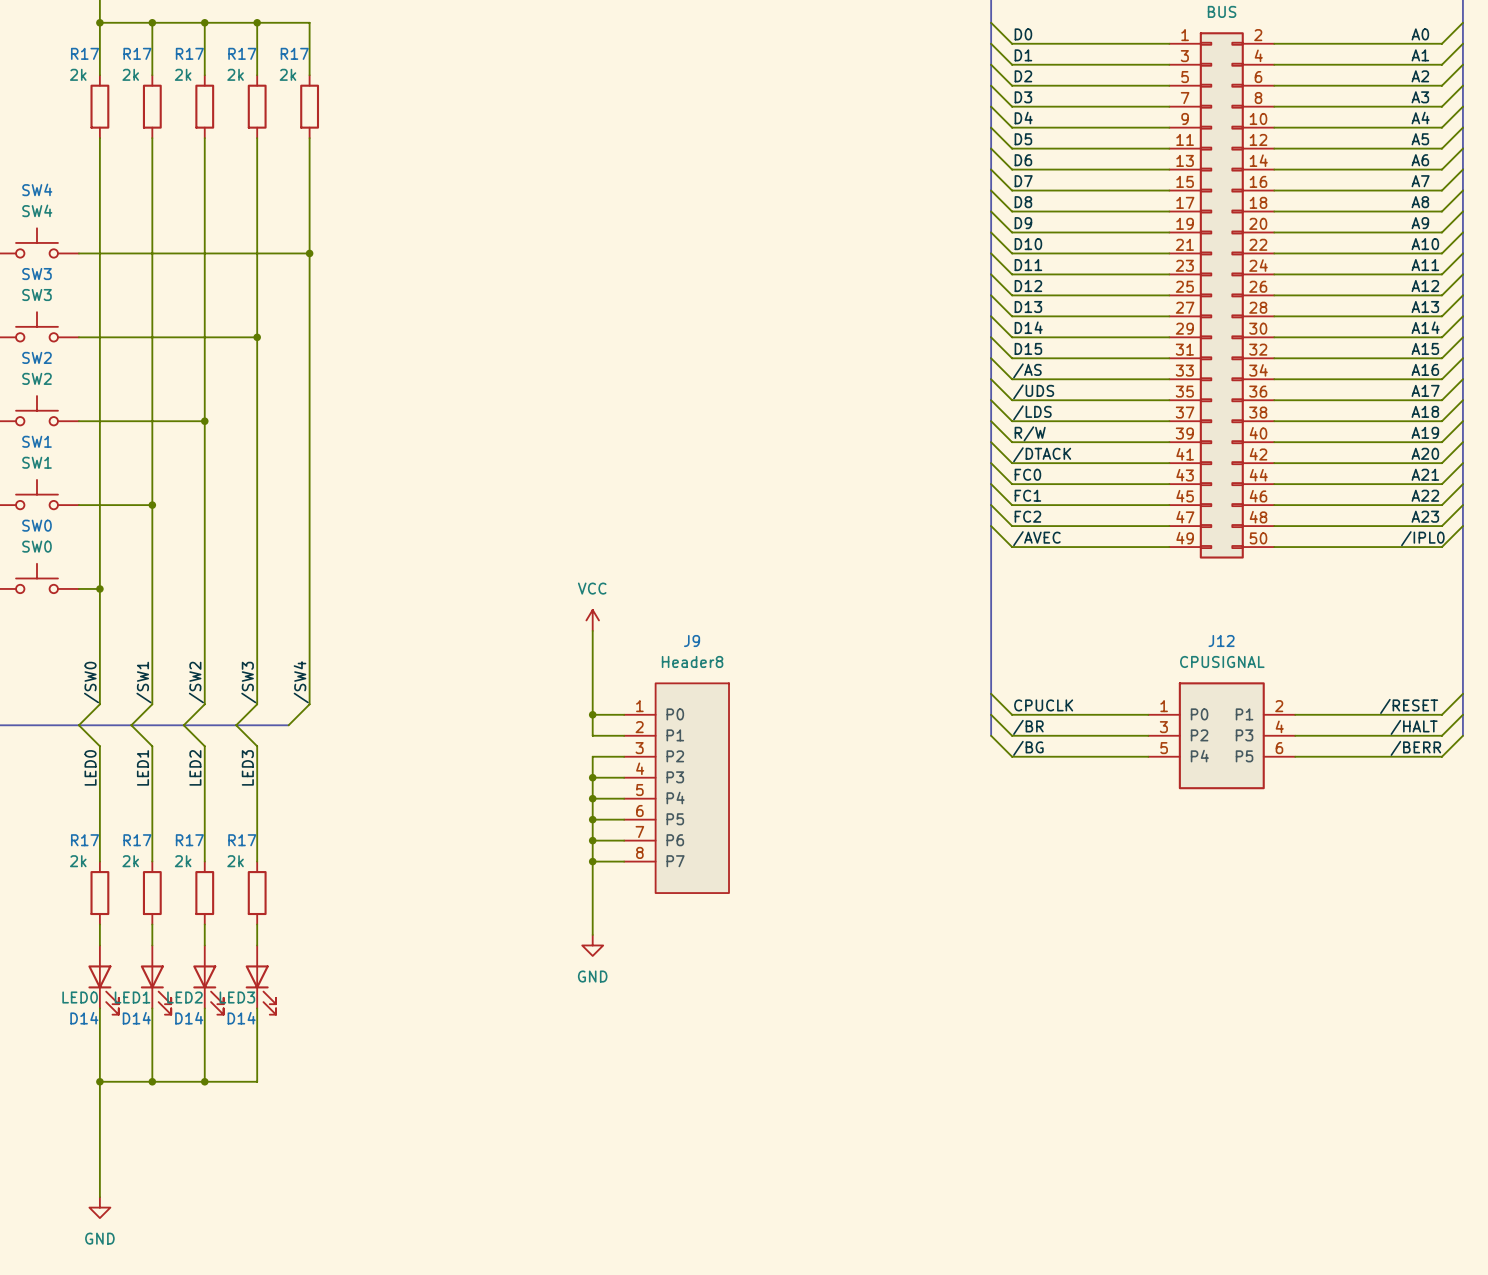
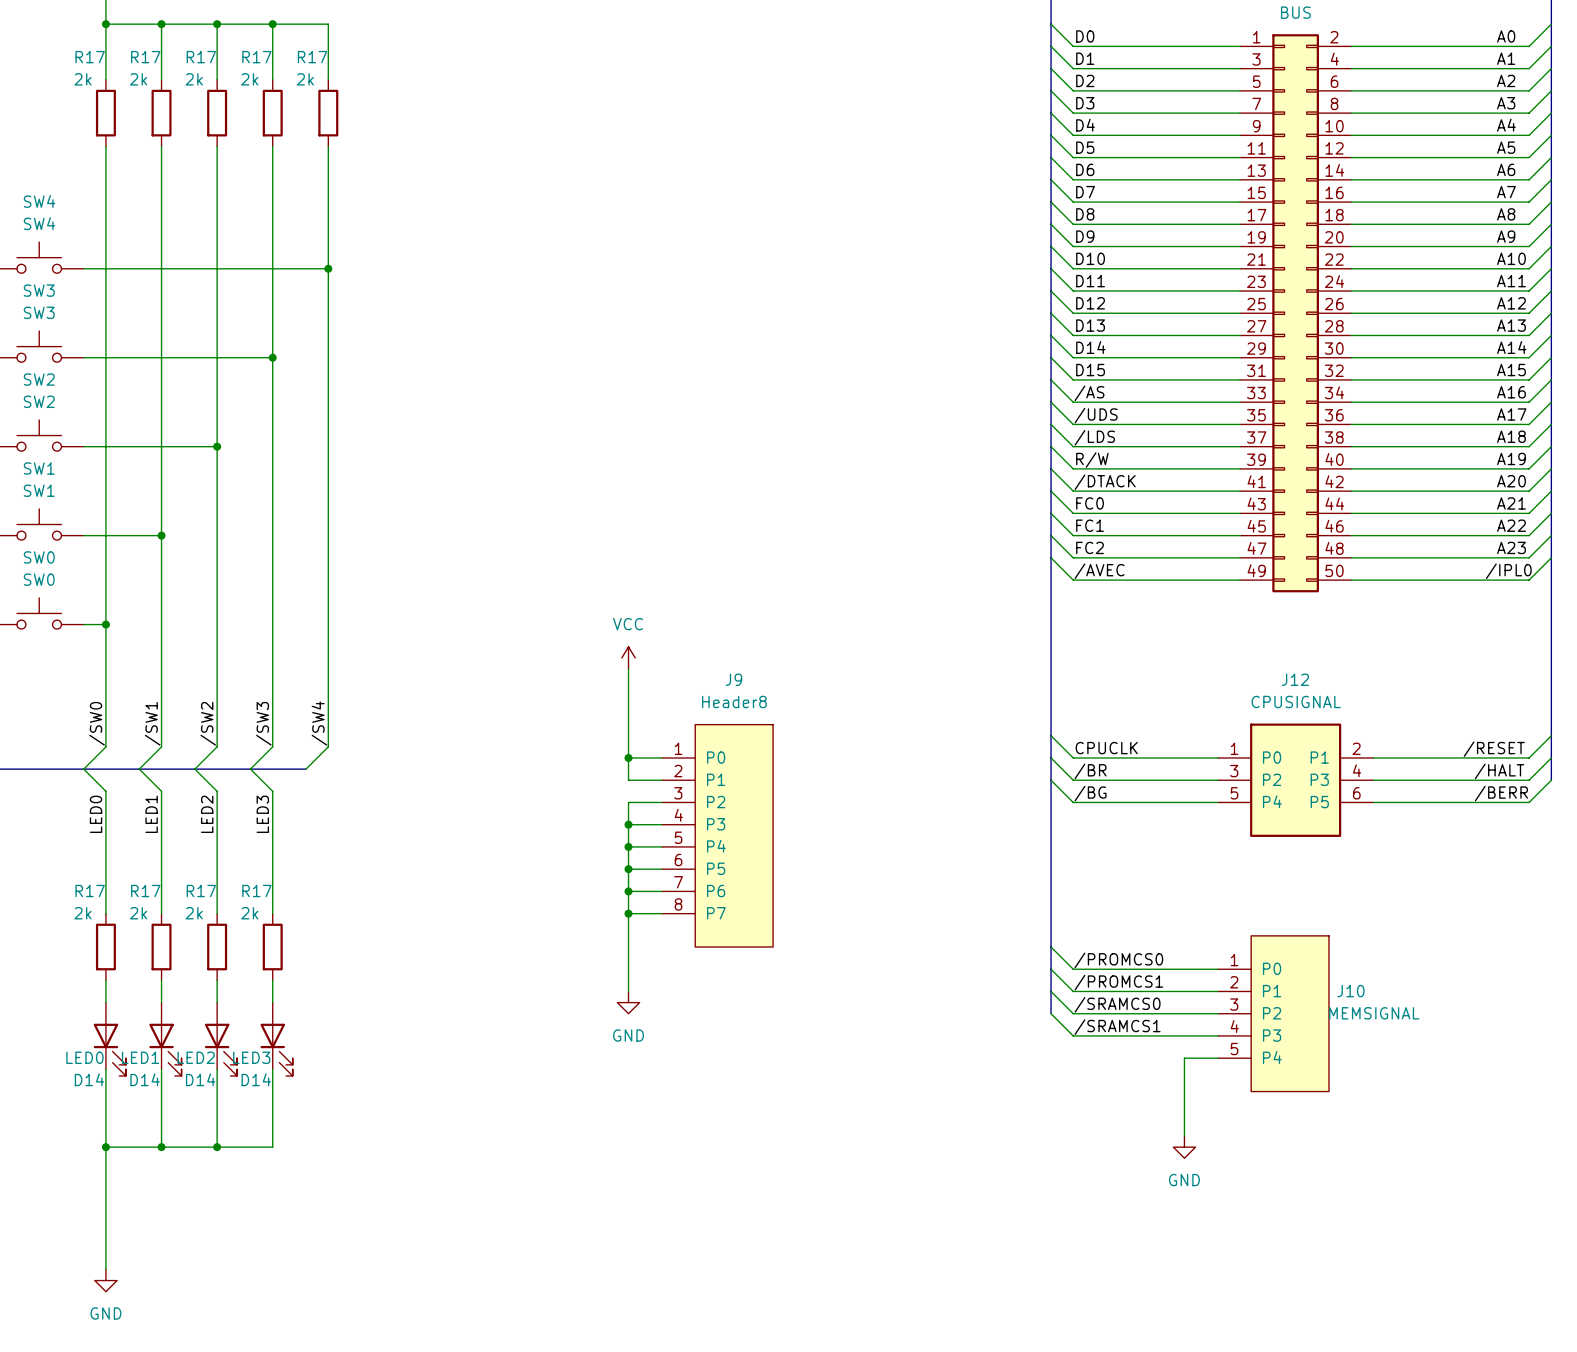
bus: none -> (1051, 780) (1051, 1013)
wire: none -> (1051, 947) (1073, 969) (1217, 969)
label: none -> /PROMCS0 (1118, 960)
wire: none -> (1051, 969) (1073, 991) (1217, 991)
label: none -> /PROMCS1 (1118, 982)
wire: none -> (1051, 991) (1073, 1013) (1217, 1013)
label: none -> /SRAMCS0 (1117, 1004)
wire: none -> (1051, 1013) (1073, 1035) (1217, 1035)
J10: none -> MEMSIGNAL (1273, 1013)
label: none -> /SRAMCS1 (1117, 1027)
wire: none -> (1217, 1058) (1184, 1058) (1184, 1136)
power symbol: none -> GND (1184, 1147)

